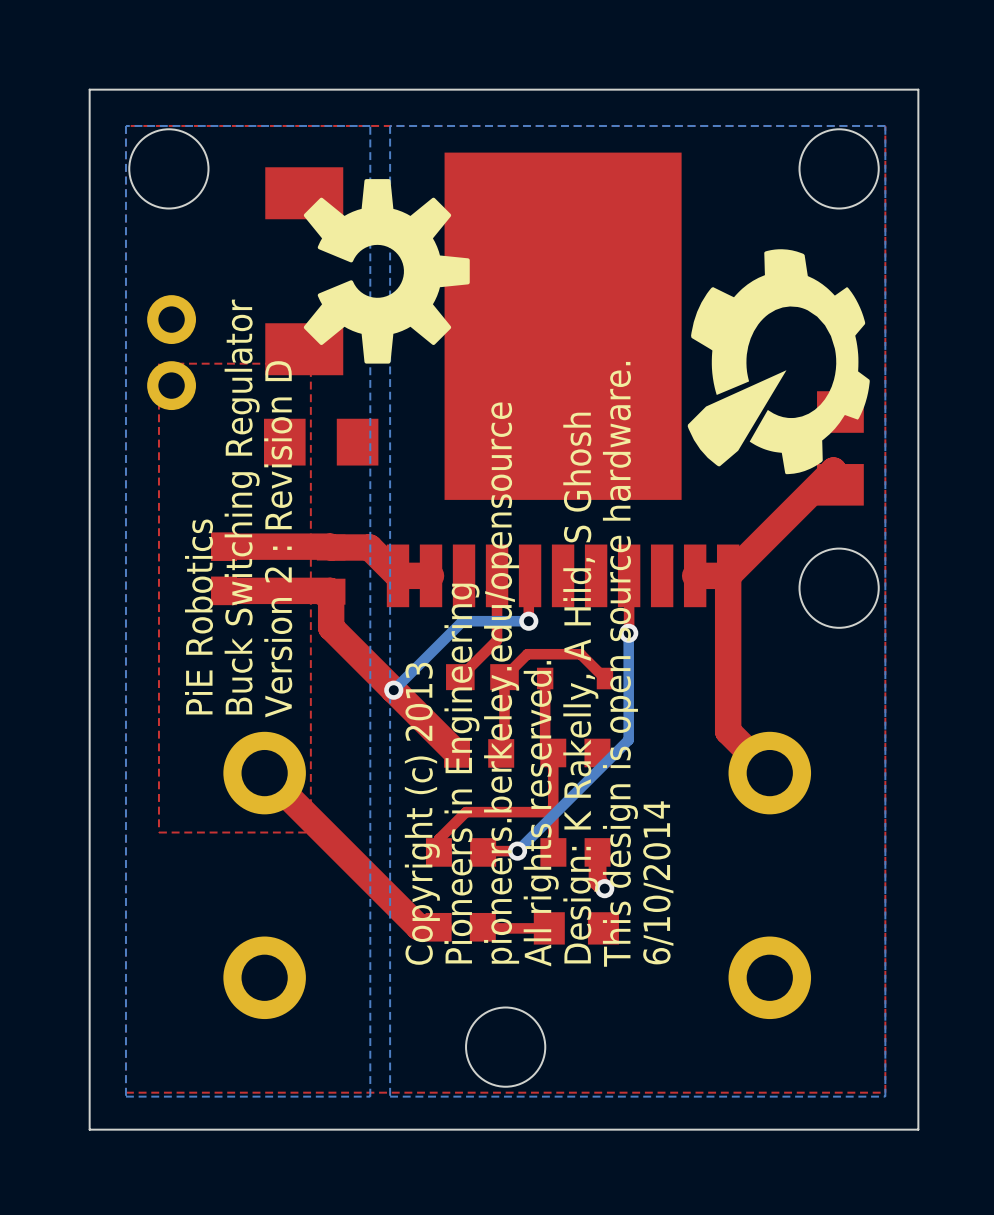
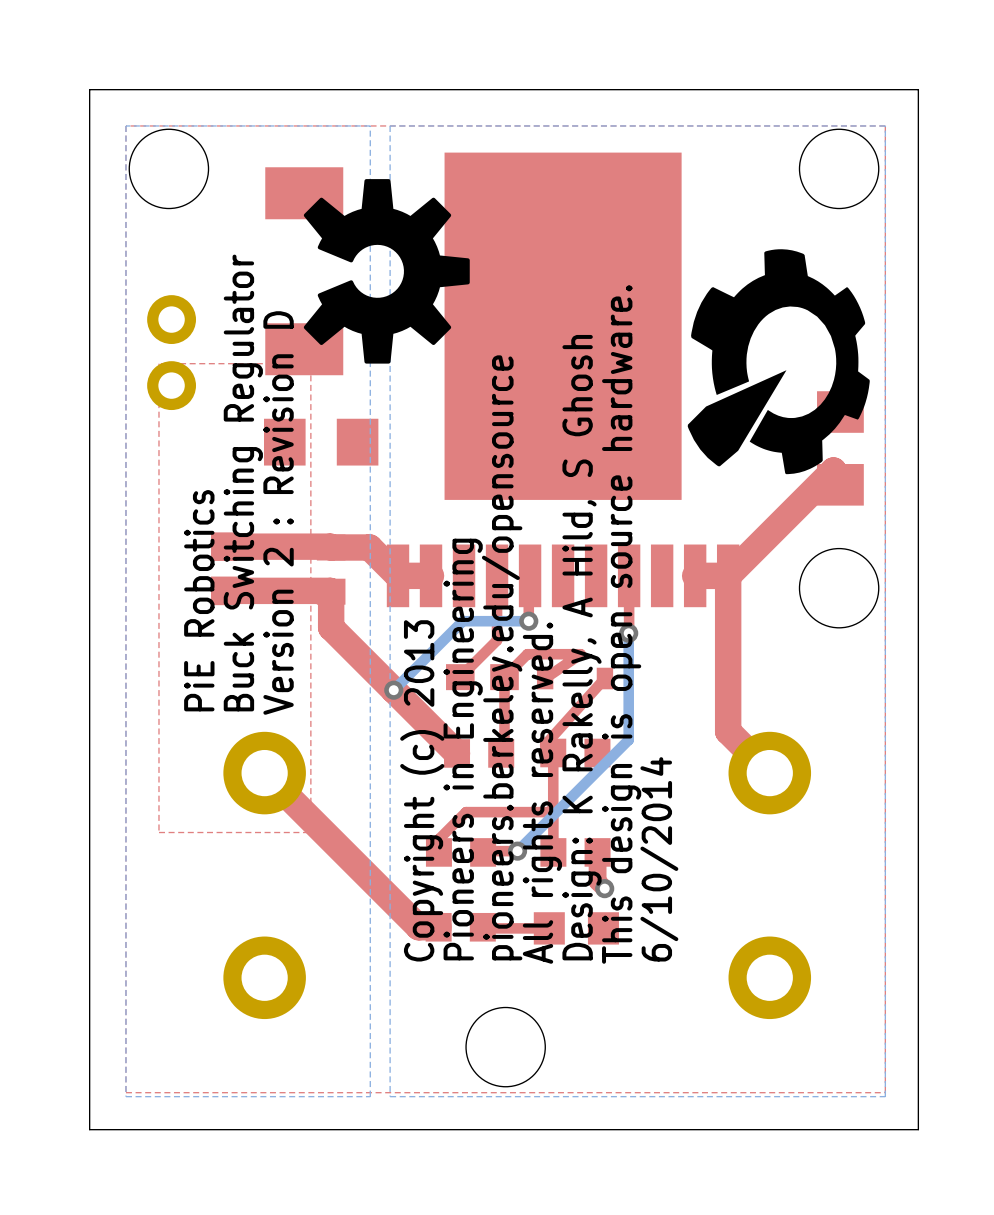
top track: (580, 654) (604, 678) -> (580, 654) (545, 678)
top track: (545, 678) (545, 744) -> (604, 678) (545, 744)

